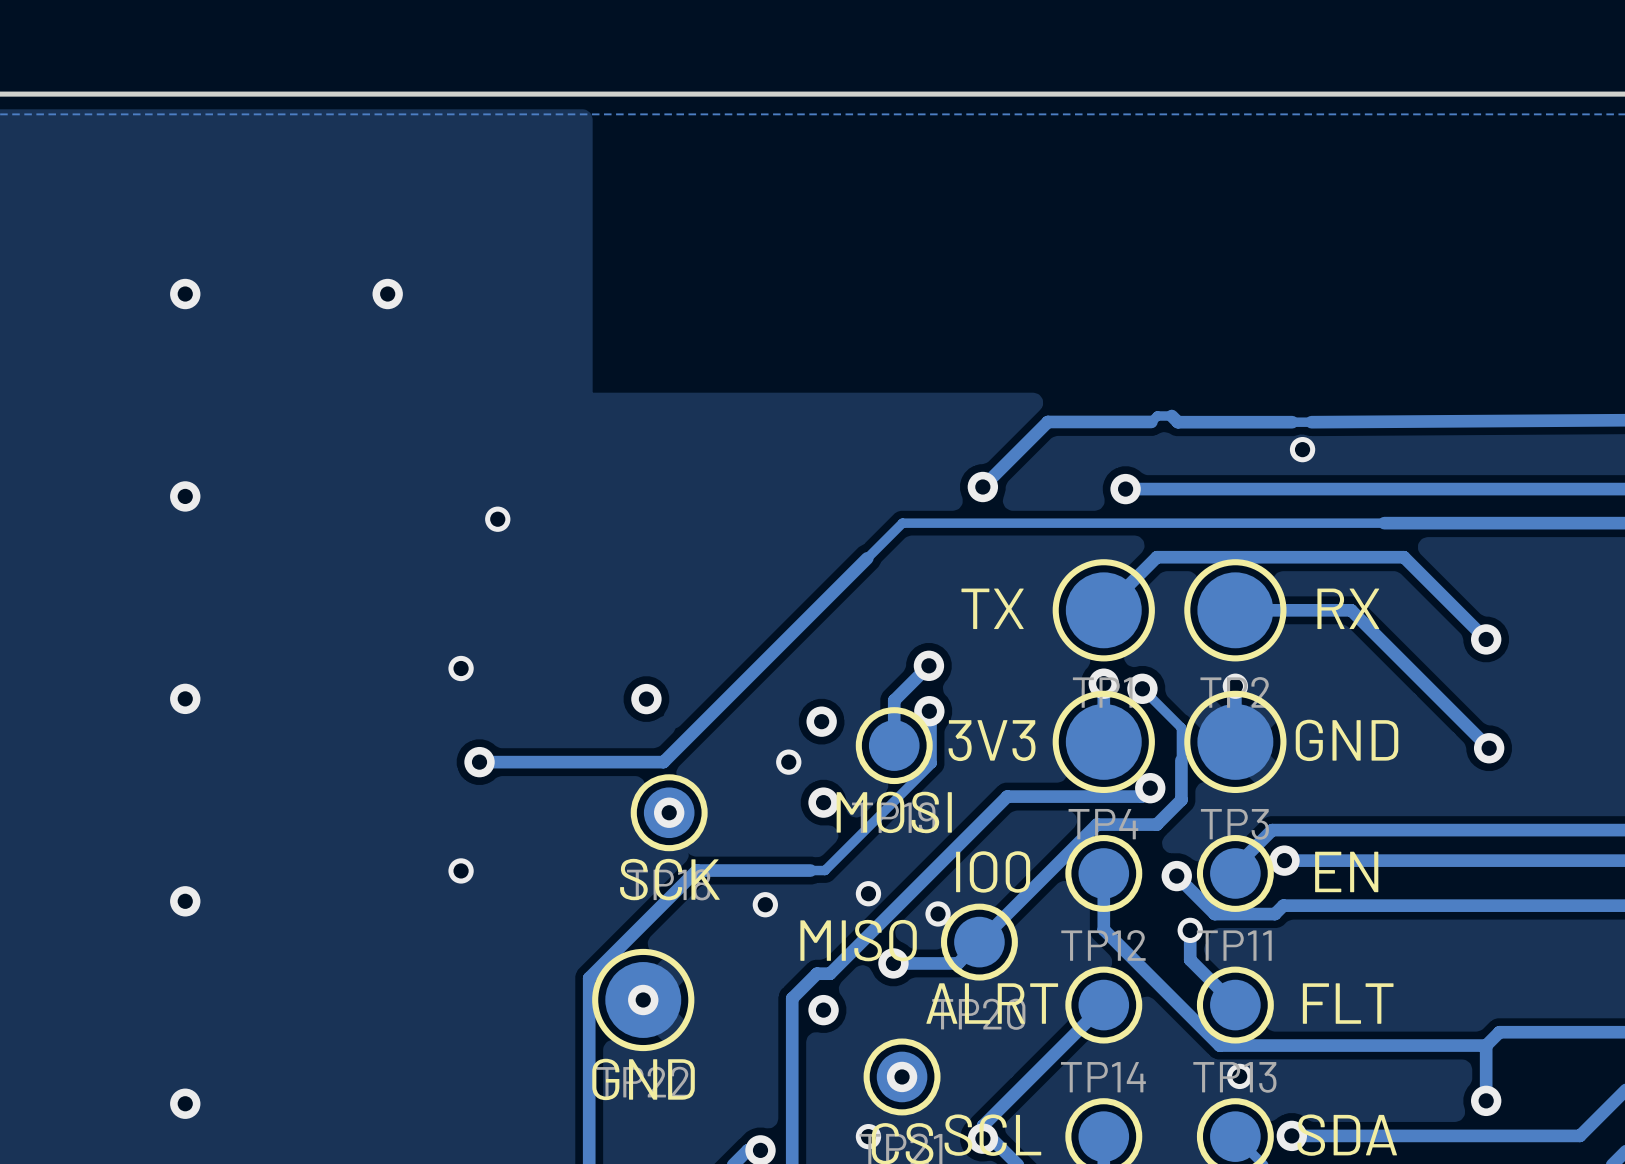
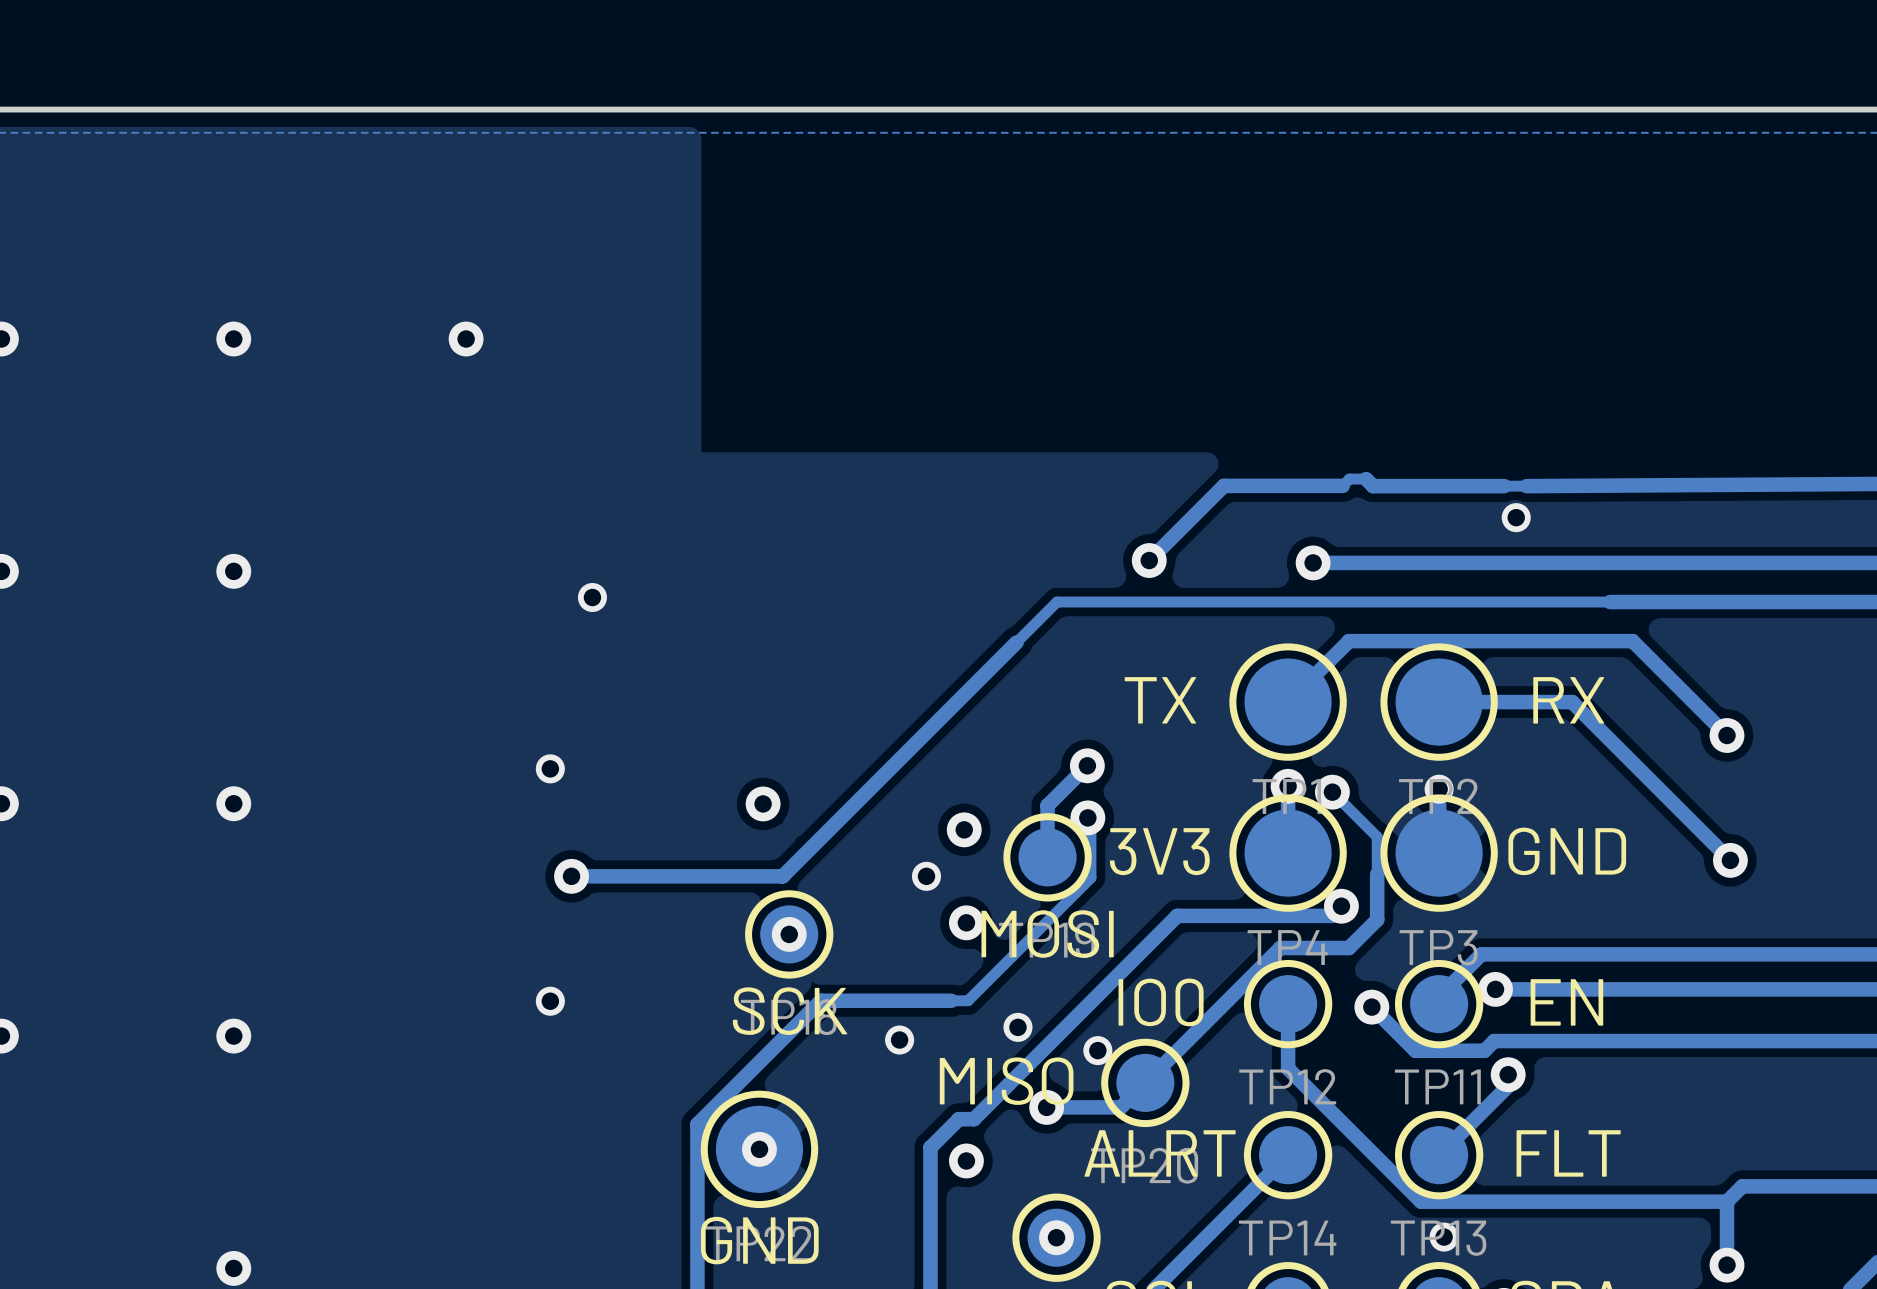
track: (1190, 930) (1190, 959) (1235, 1005) -> (1508, 1074) (1508, 1086) (1439, 1155)
via: (1190, 930) -> none
via: none -> (1508, 1074)

